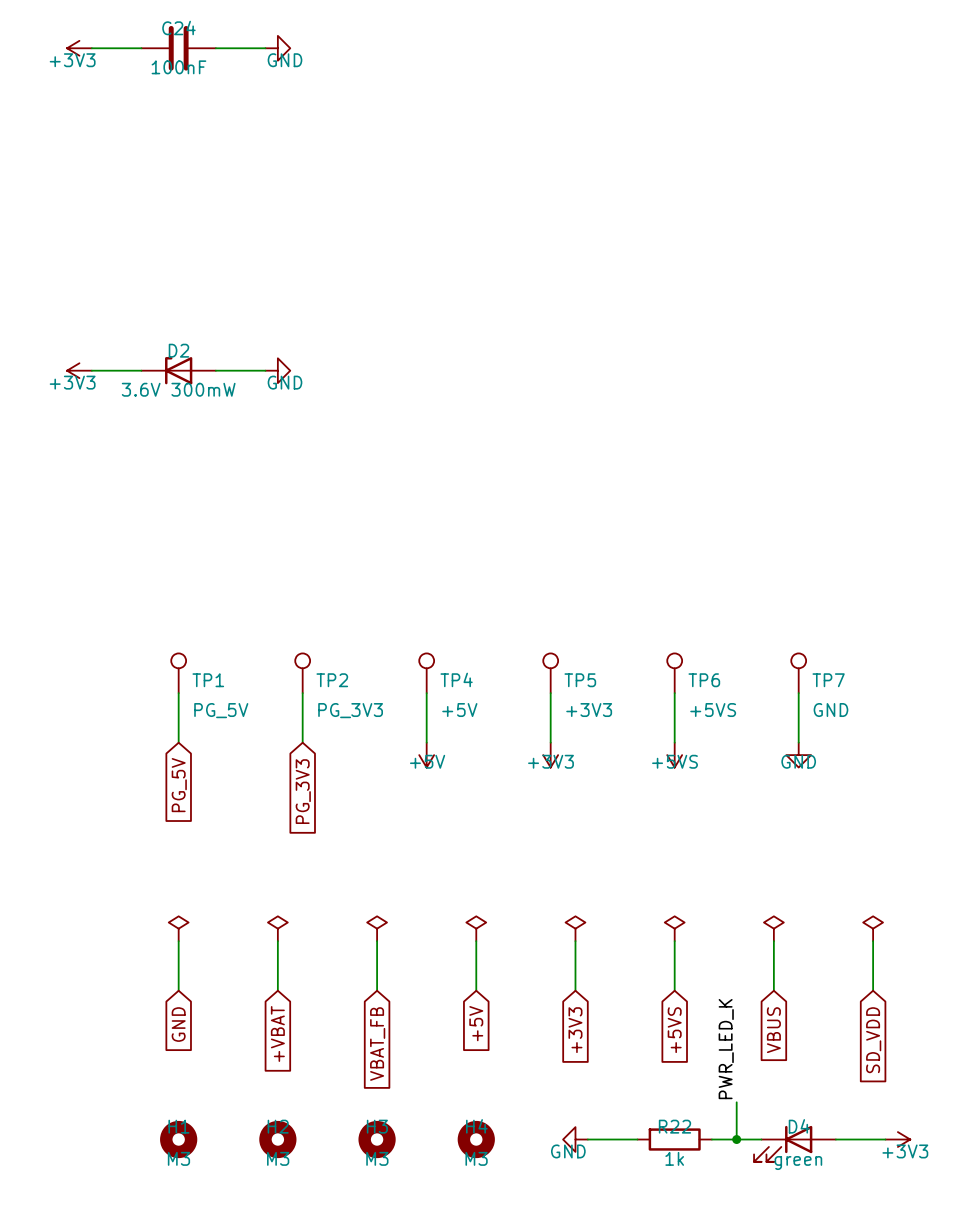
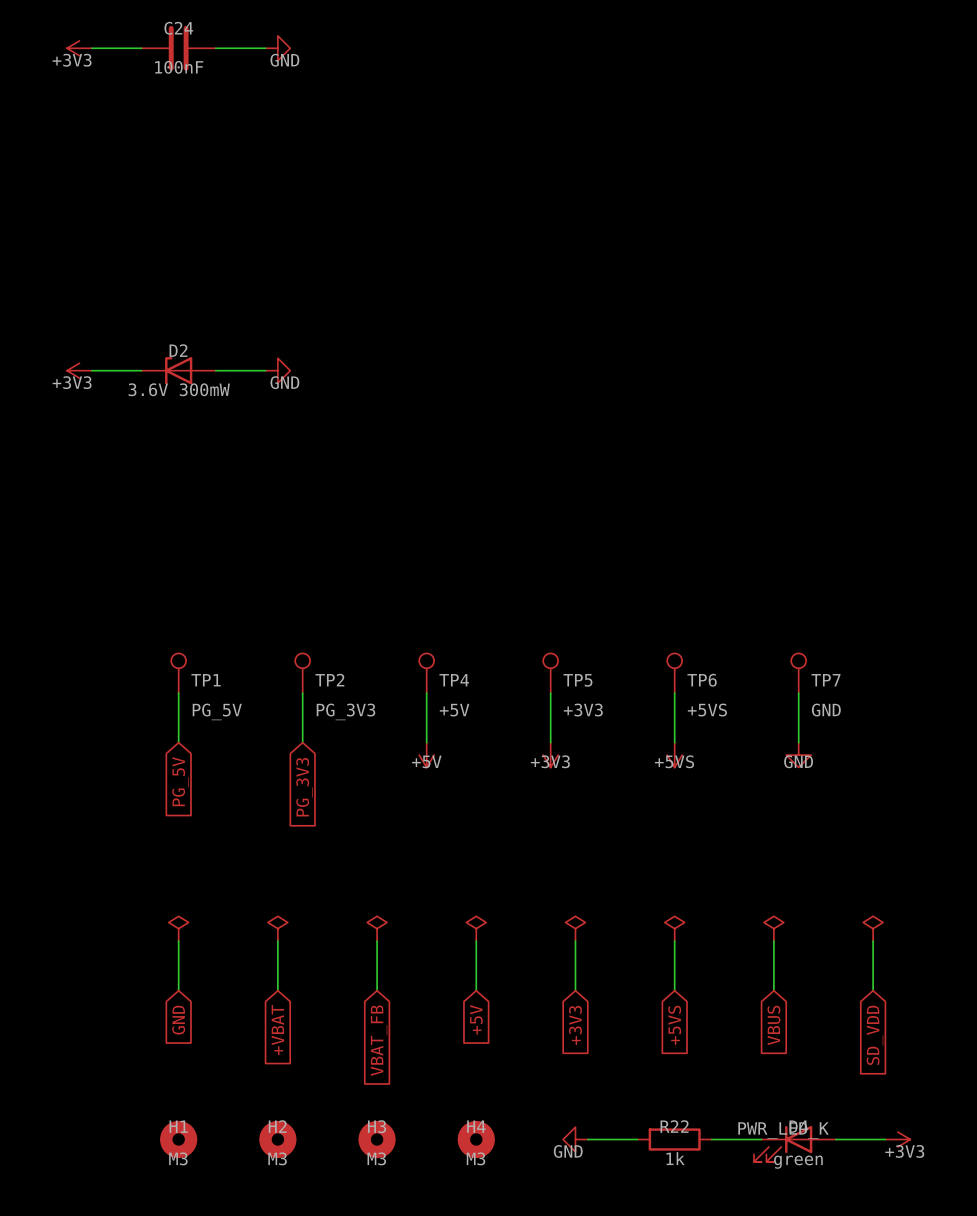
label rotation: 0° (726, 1049) -> 90° clockwise (783, 1130)
wire: (736, 1102) (736, 1139) -> none
junction: (736, 1139) -> none

